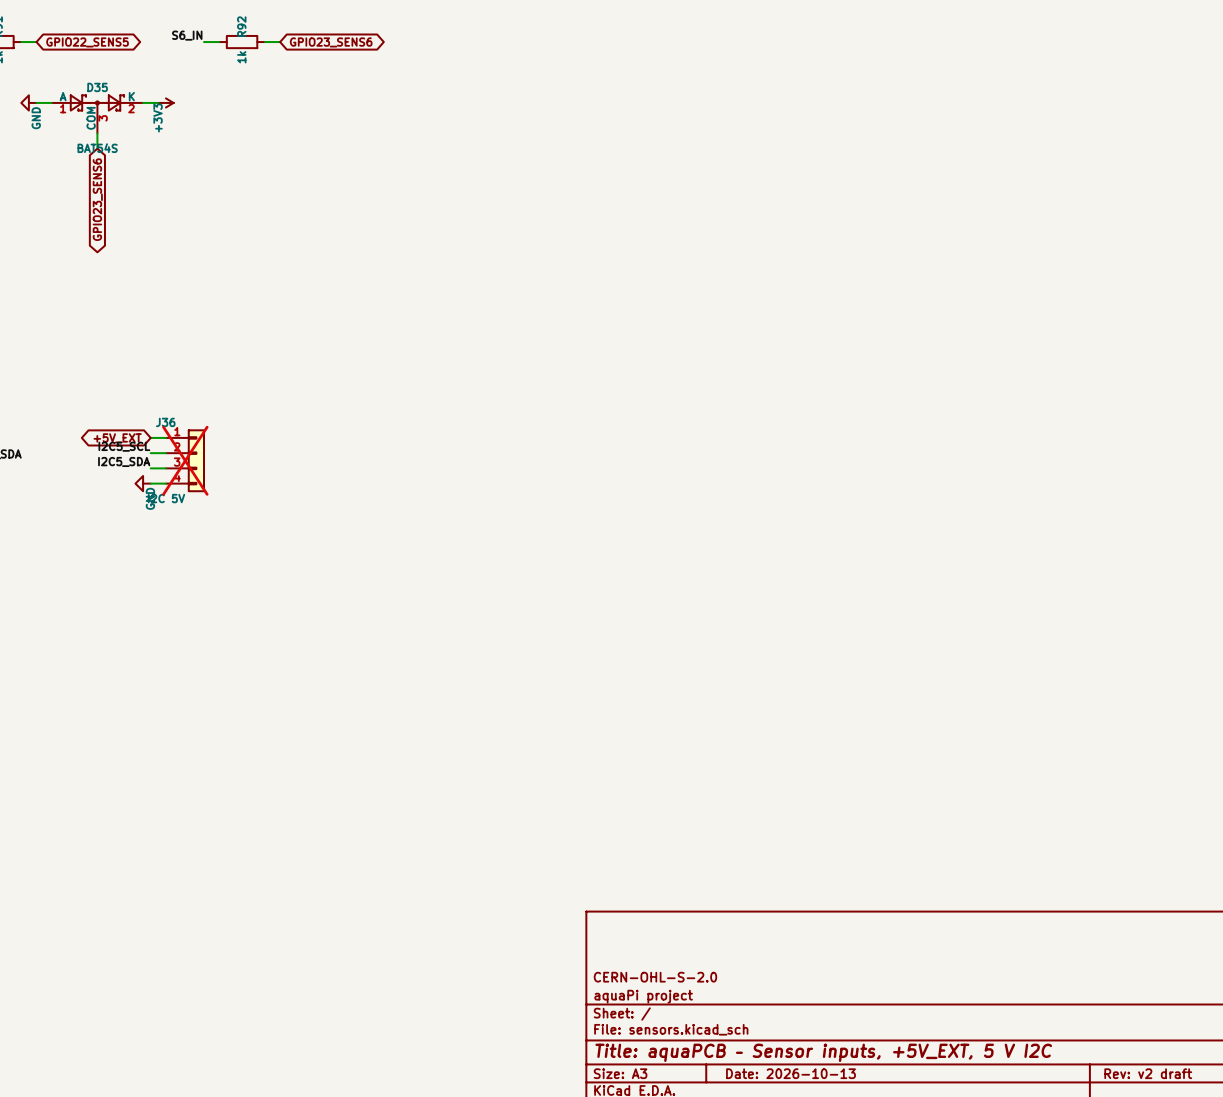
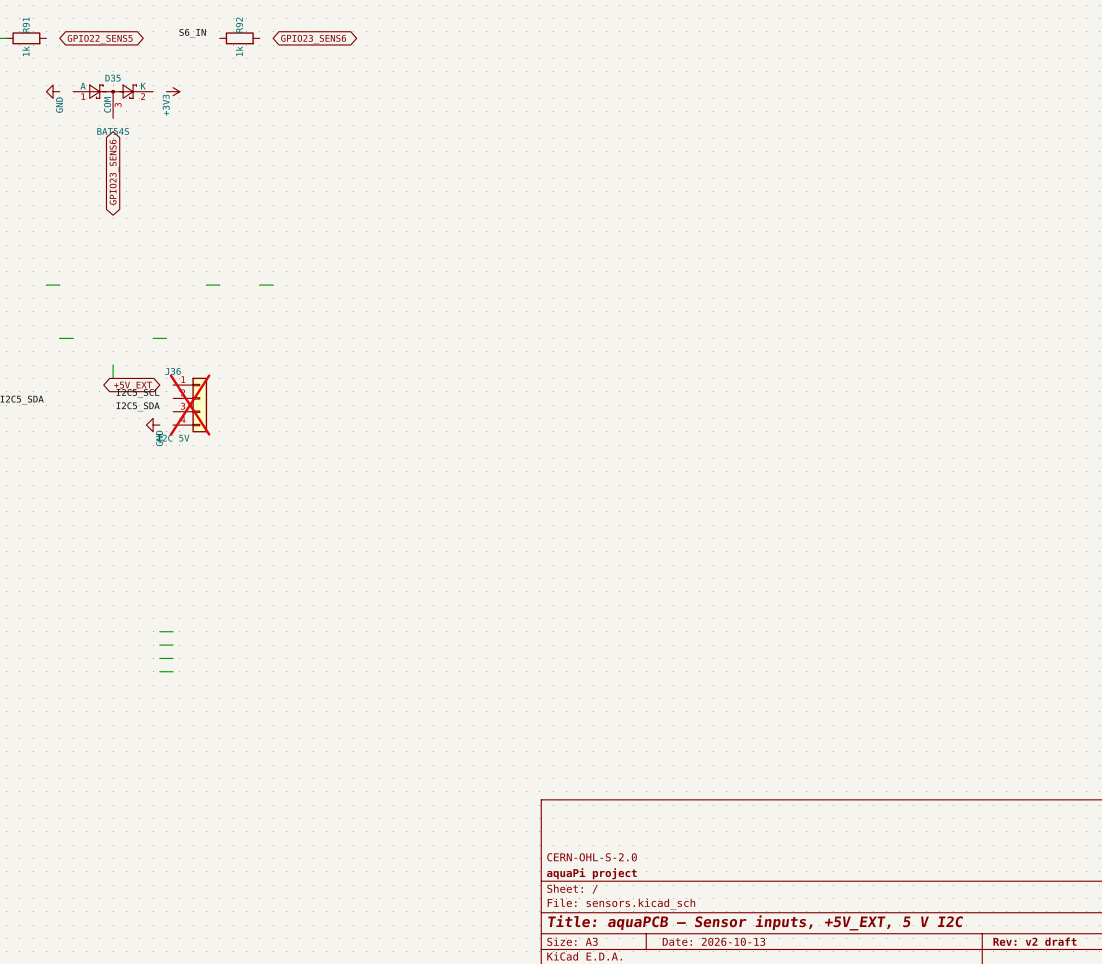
wire: (21, 42) (36, 42) -> none
wire: (204, 42) (219, 42) -> none
wire: (264, 42) (280, 42) -> none
wire: (36, 102) (51, 102) -> none
wire: (143, 102) (158, 102) -> none
wire: (97, 133) (97, 148) -> none
wire: none -> (46, 285) (59, 285)
wire: none -> (206, 285) (219, 285)
wire: none -> (259, 285) (273, 285)
wire: none -> (113, 365) (113, 378)
wire: (150, 437) (165, 437) -> (153, 338) (166, 338)
wire: (150, 453) (165, 453) -> (59, 338) (73, 338)
wire: (150, 468) (165, 468) -> none
wire: (150, 483) (165, 483) -> none
wire: none -> (159, 631) (173, 631)
wire: none -> (159, 645) (173, 645)
wire: none -> (159, 658) (173, 658)
wire: none -> (159, 671) (173, 671)

